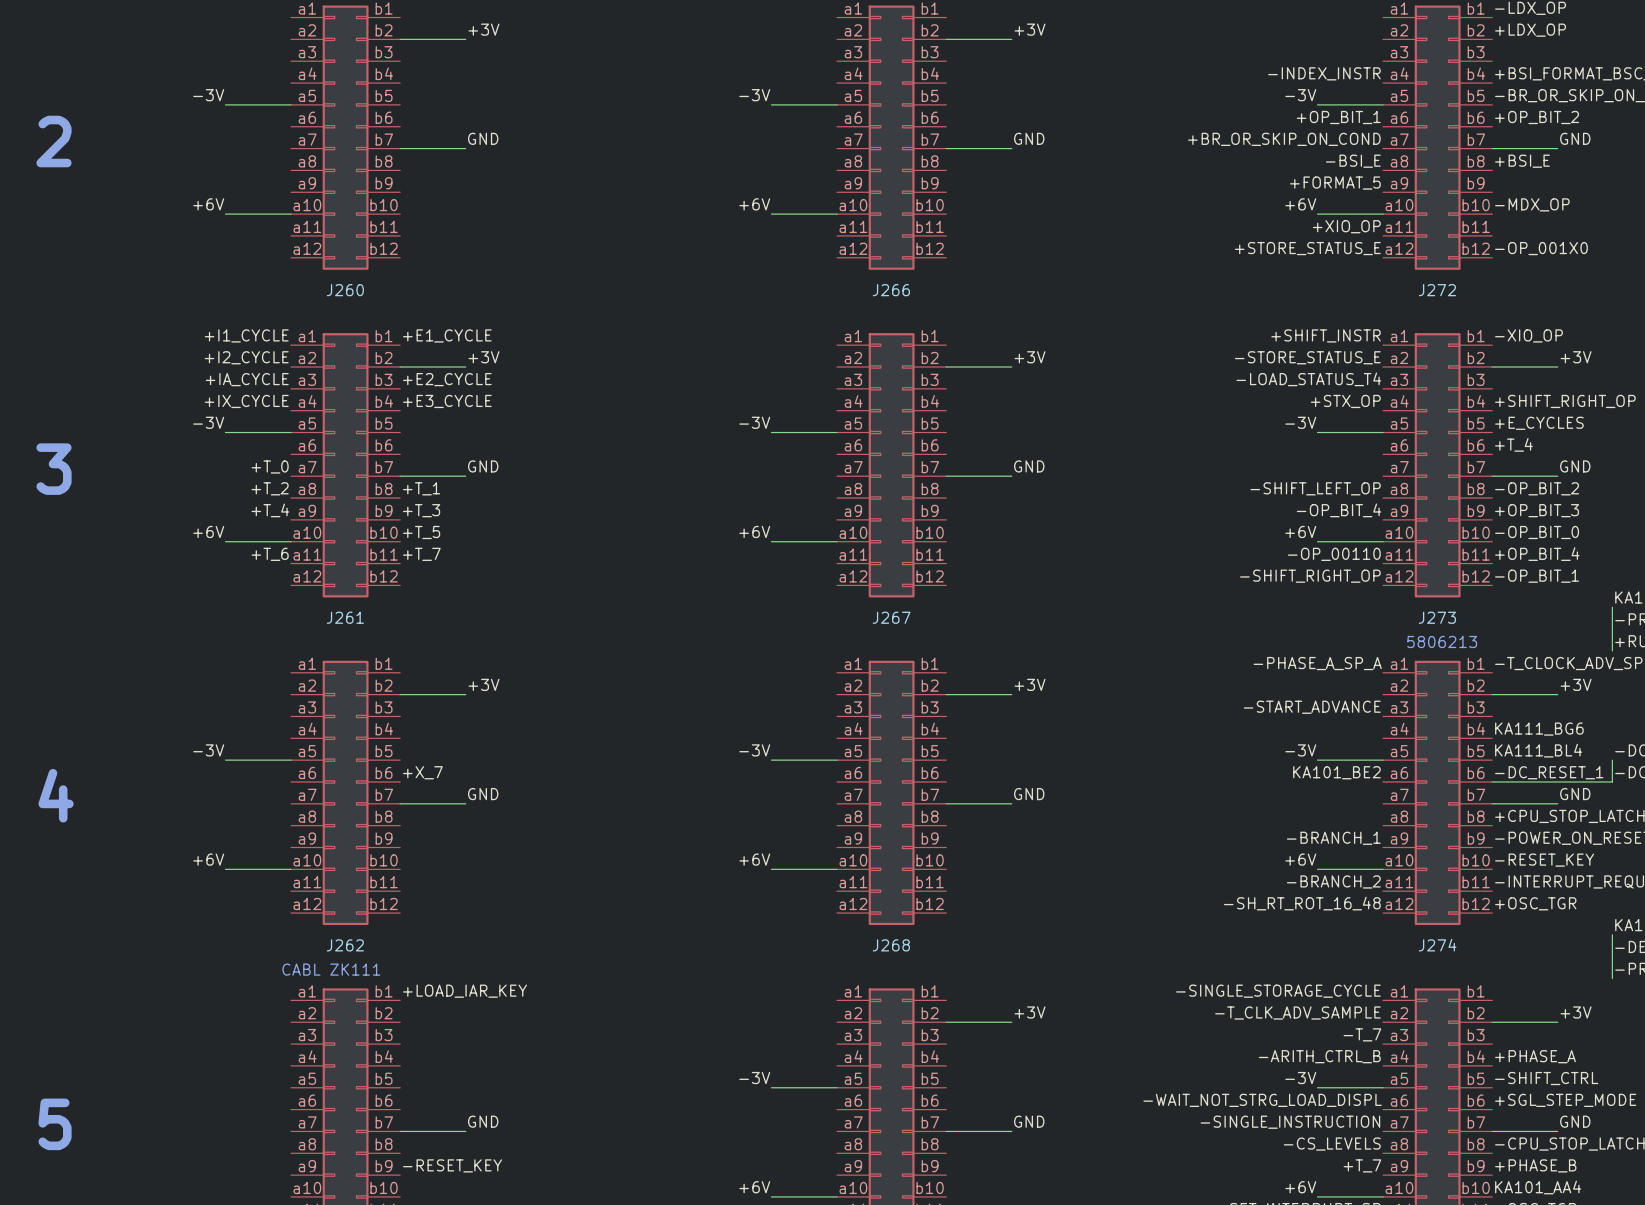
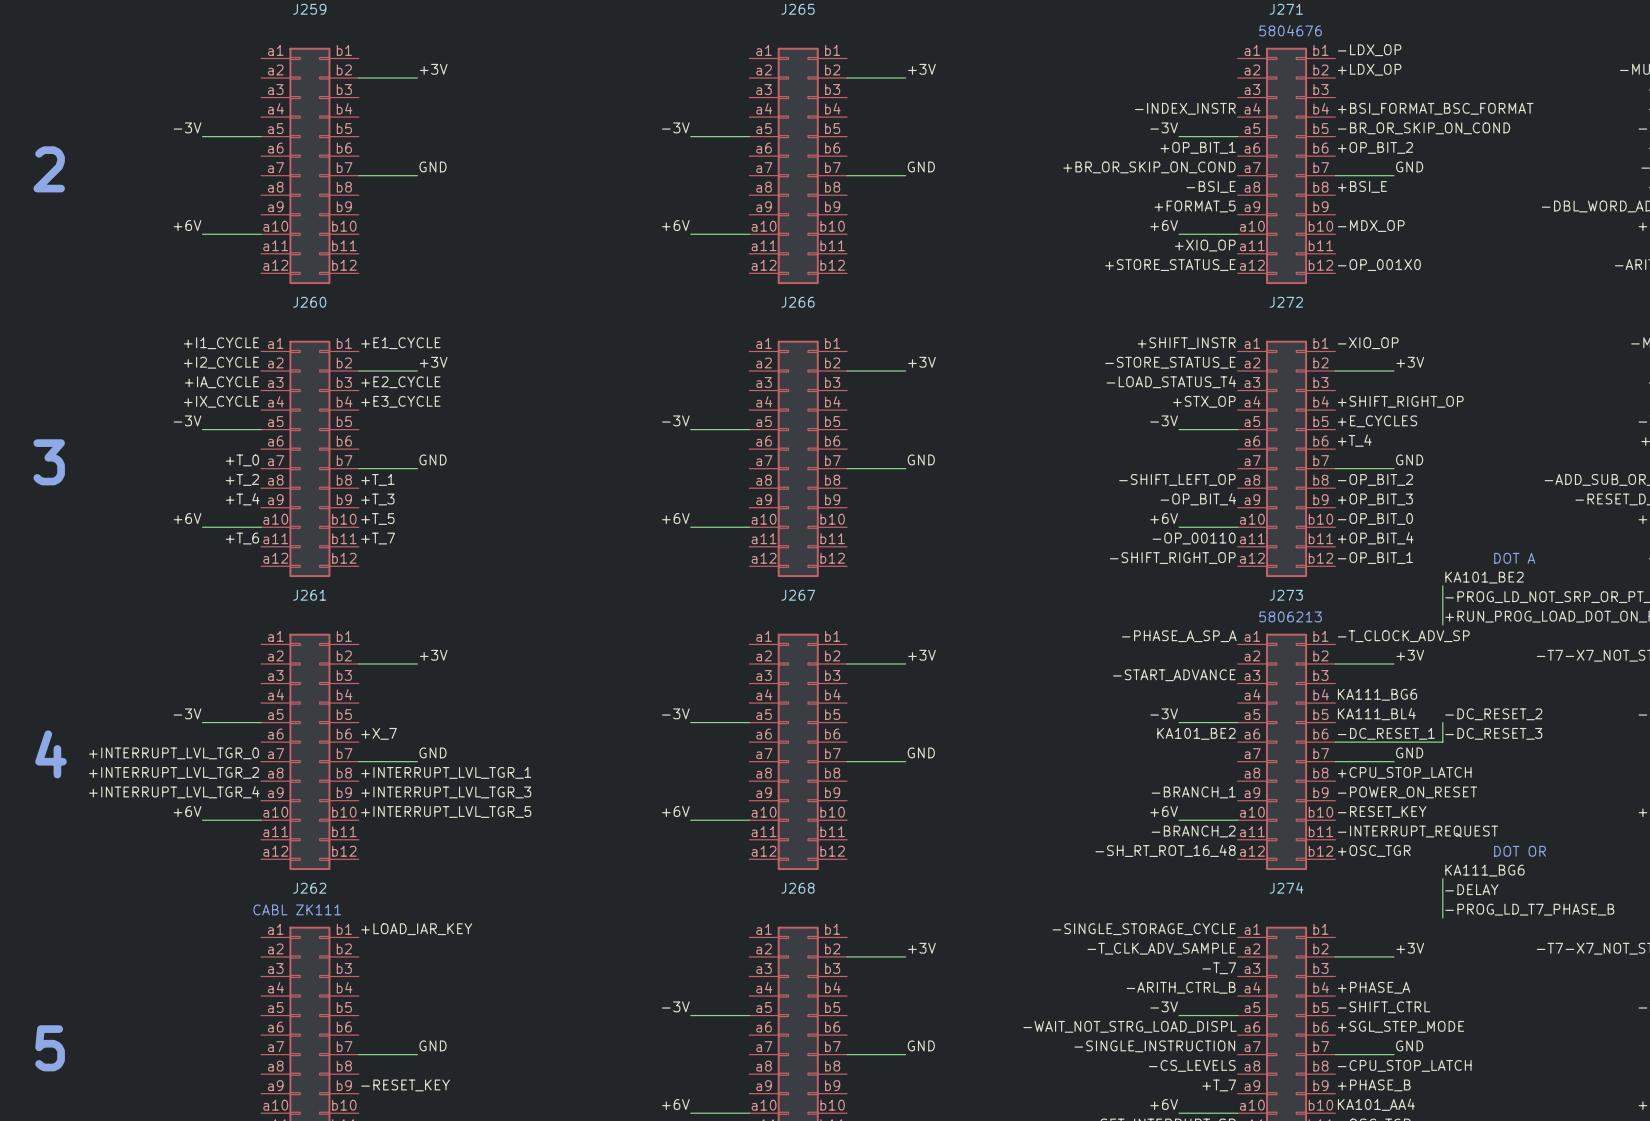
label: none -> +INTERRUPT_LVL_TGR_0 (174, 753)
label: none -> +INTERRUPT_LVL_TGR_2 (174, 772)
label: none -> +INTERRUPT_LVL_TGR_1 (446, 772)
label: none -> +INTERRUPT_LVL_TGR_4 (174, 792)
label: none -> +INTERRUPT_LVL_TGR_3 (446, 792)
label: none -> +INTERRUPT_LVL_TGR_5 (446, 811)

